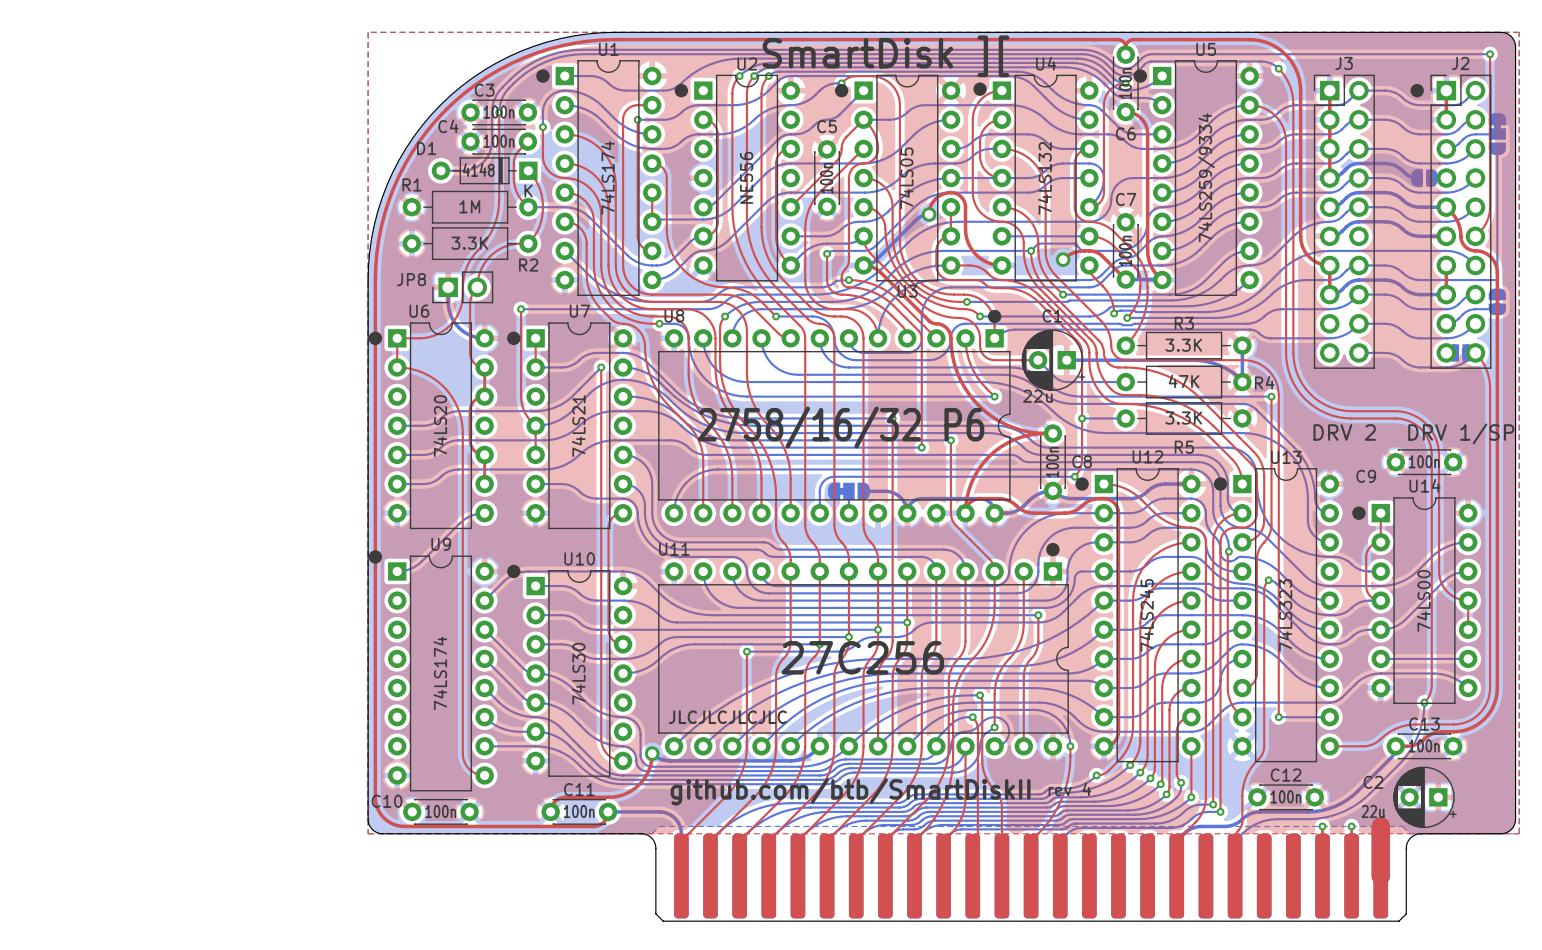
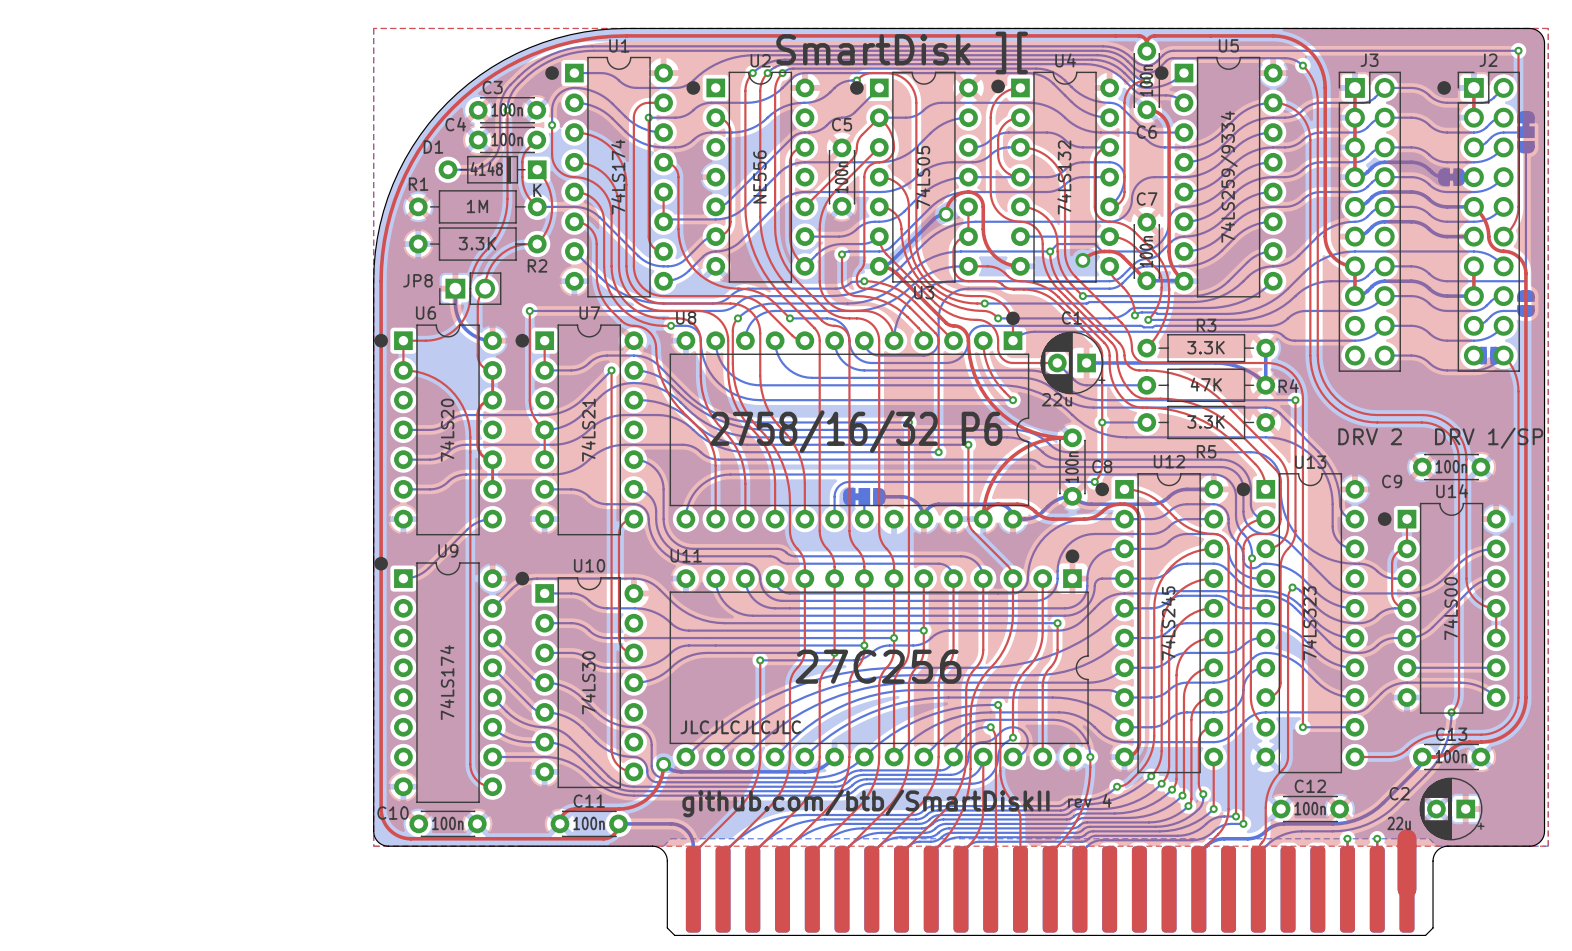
part footprint: [1411, 169, 1438, 187] -> [1438, 168, 1466, 186]

